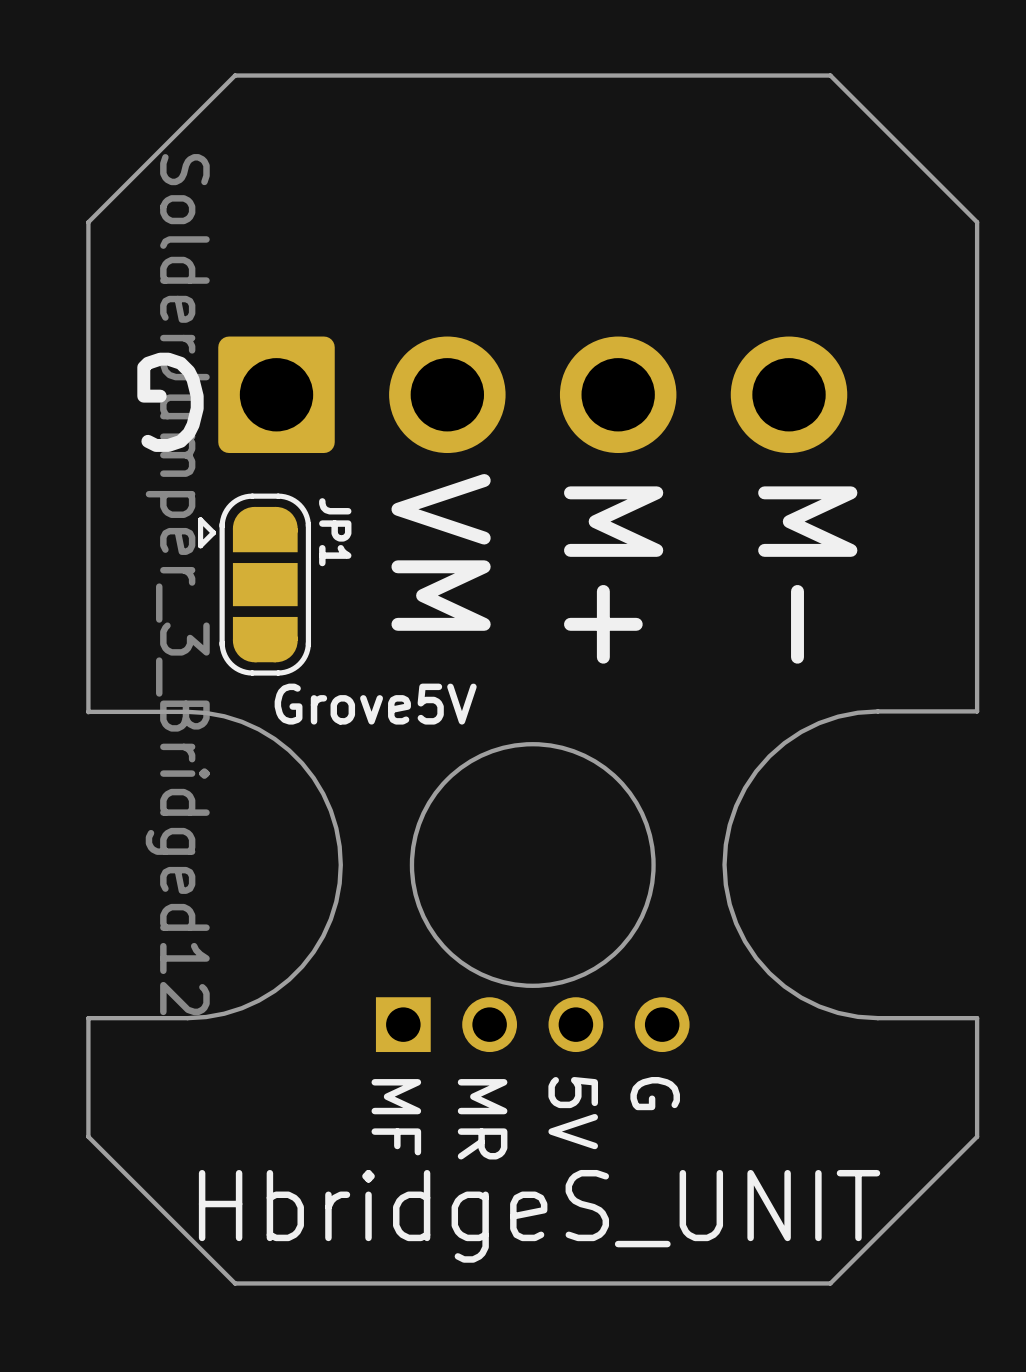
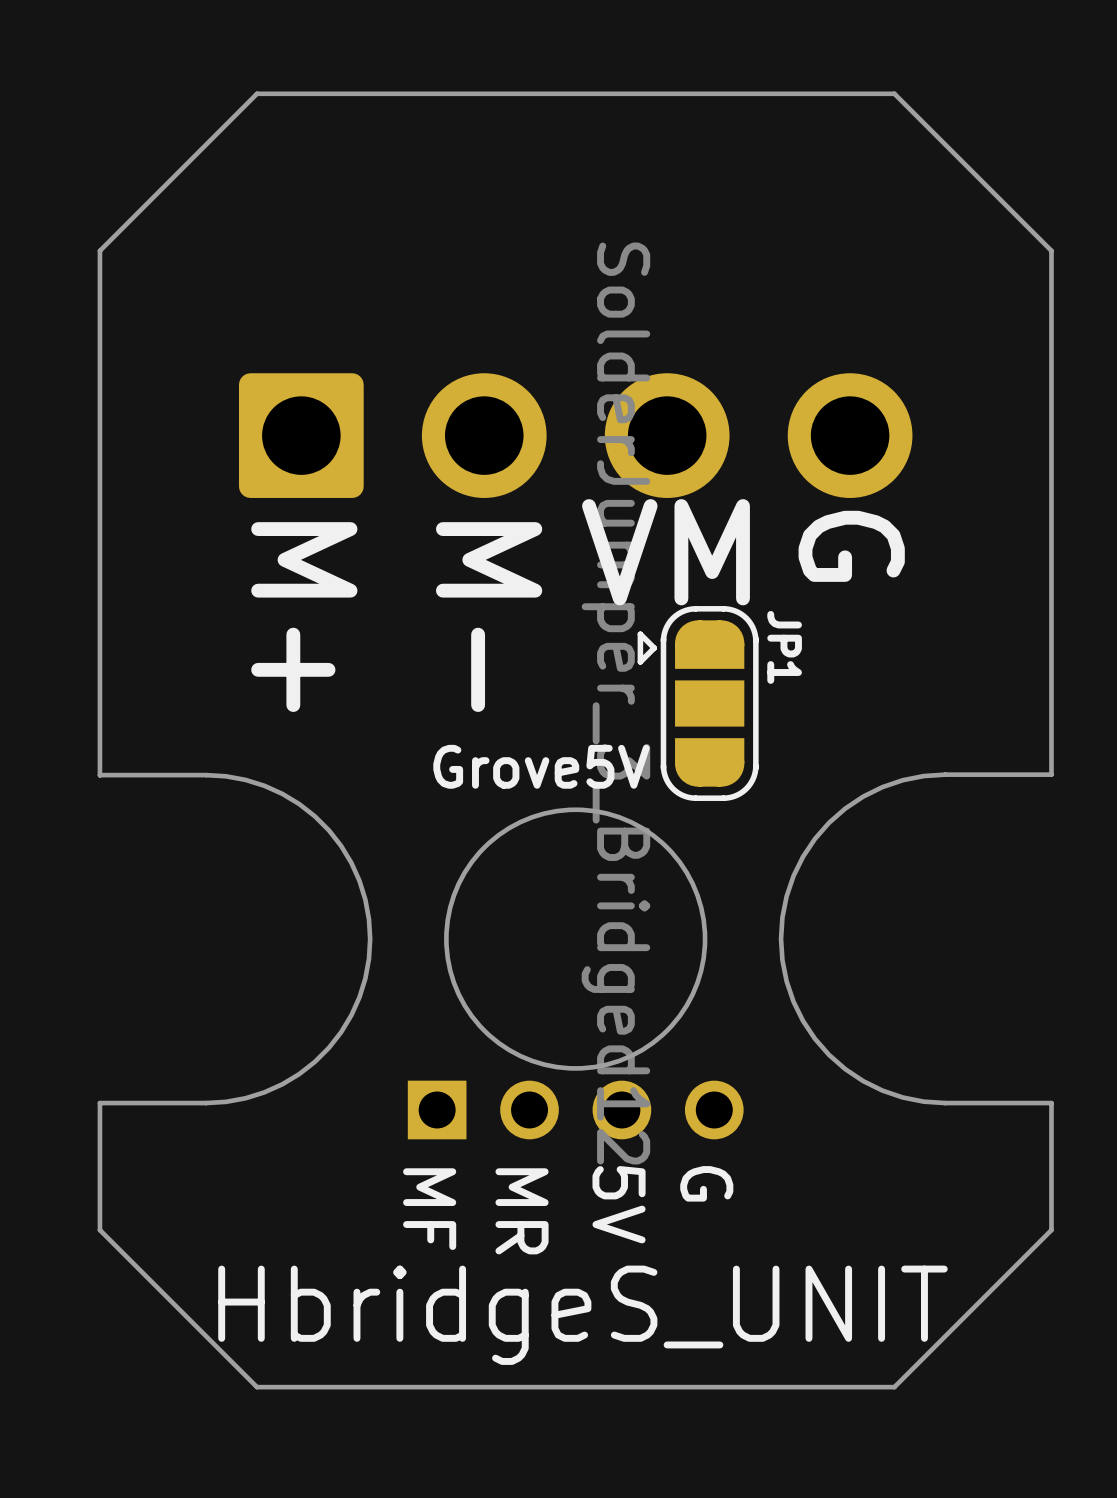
text rotation: 0° (170, 402) -> 90° counterclockwise (851, 546)
text position: G (170, 402) -> G (851, 546)
text rotation: 0° (441, 552) -> 90° counterclockwise (666, 552)
text position: M+ (613, 575) -> M+ (304, 617)
text position: M- (807, 575) -> M- (489, 617)
JP1 position: (254, 584) -> (698, 703)
text position: Grove5V (375, 704) -> Grove5V (541, 766)

